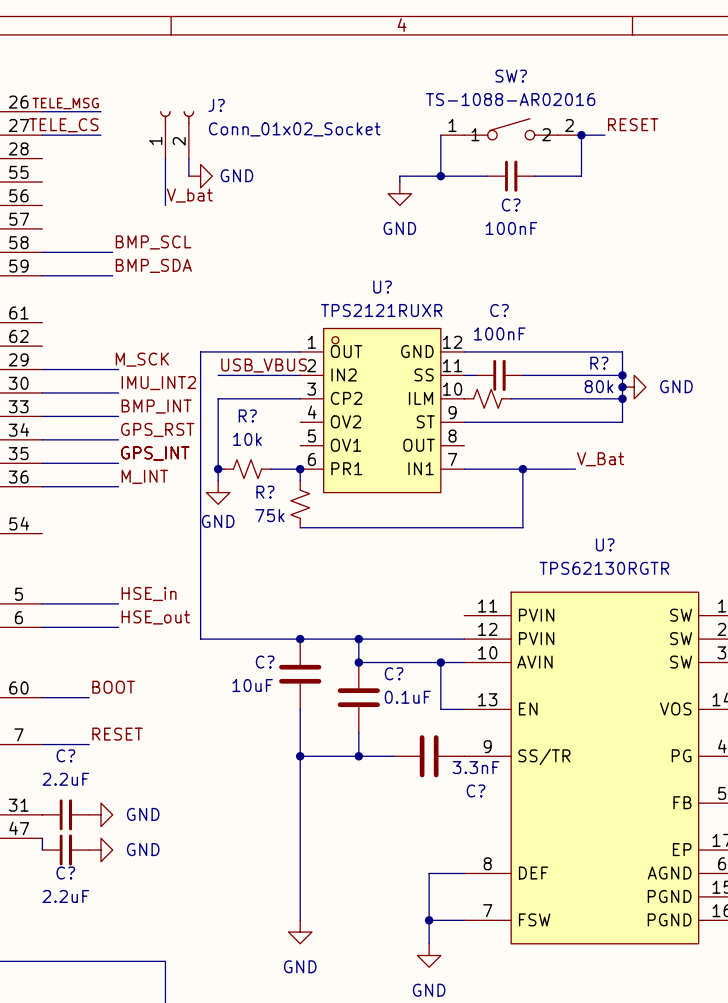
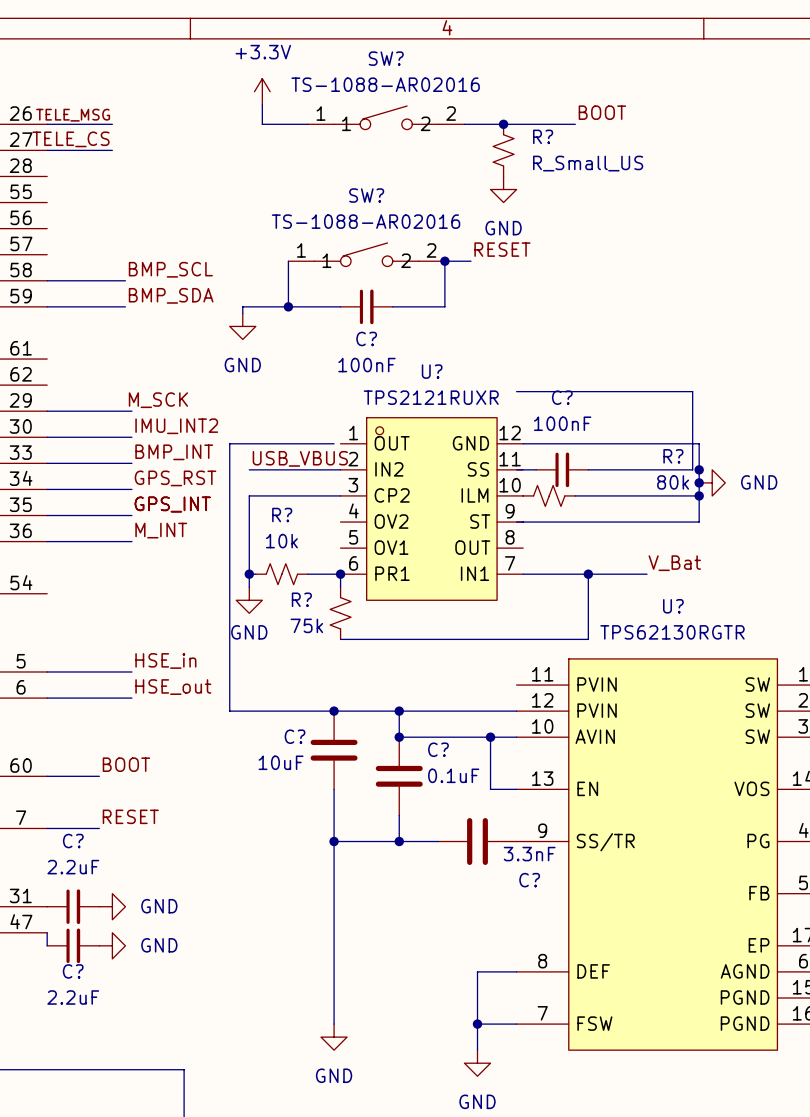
power symbol: none -> +3.3V (262, 91)
wire: none -> (262, 104) (262, 124) (307, 124)
label: none -> BOOT (602, 112)
SW?: none -> TS-1088-AR02016 (386, 117)
wire: none -> (464, 124) (575, 124)
junction: none -> (503, 124)
label position: RESET (633, 124) -> RESET (502, 249)
SW?: TS-1088-AR02016 (511, 129) -> none
J?: Conn_01x02_Socket (177, 134) -> none
wire: (440, 135) (440, 176) -> (288, 261) (288, 306)
R?: none -> R_Small_US (503, 150)
junction: (581, 135) -> none
wire: (604, 135) (581, 135) (581, 176) (534, 176) -> (470, 261) (444, 261) (444, 306) (392, 306)
wire: (165, 158) (165, 205) -> none
wire: (188, 158) (188, 176) -> none
power symbol: GND (200, 176) -> none
junction: (440, 176) -> none
wire: (487, 176) (399, 176) (399, 182) -> (340, 306) (242, 306) (242, 313)
C?: 100nF (511, 176) -> none
power symbol position: GND (399, 193) -> GND (503, 189)
label: V_bat (189, 195) -> none
SW?: none -> TS-1088-AR02016 (366, 254)
junction: none -> (444, 261)
junction: none -> (288, 306)
C?: none -> 100nF (366, 306)
power symbol: none -> GND (242, 326)
wire: (300, 351) (200, 351) (200, 639) (206, 639) -> (242, 443) (229, 443) (229, 711)
label position: USB_VBUS (264, 365) -> USB_VBUS (300, 458)
wire: (218, 375) (300, 375) -> (249, 469) (340, 469)
wire: (464, 375) (476, 375) -> none
C? position: (499, 375) -> (562, 469)
wire: (522, 375) (622, 375) -> none
junction: (622, 375) -> none
junction: (622, 387) -> none
power symbol position: GND (634, 387) -> GND (712, 482)
wire: (218, 398) (218, 480) -> none
wire: none -> (523, 443) (568, 443)
R? position: (487, 398) -> (549, 495)
wire: none -> (692, 443) (699, 443) (699, 522) (640, 522)
junction: (622, 398) -> none
U? position: (382, 410) -> (431, 508)
junction: none -> (699, 469)
junction: none -> (699, 482)
wire: none -> (340, 495) (249, 495) (249, 587)
wire: none -> (575, 495) (699, 495)
junction: none -> (699, 495)
label position: V_Bat (600, 459) -> V_Bat (674, 563)
junction: (218, 469) -> none
R? position: (247, 469) -> (281, 574)
wire: (270, 469) (300, 469) (300, 480) -> (307, 574) (340, 574) (340, 587)
junction: (300, 469) -> none
wire: (522, 469) (522, 527) (300, 527) -> (588, 574) (588, 639) (340, 639)
junction position: (522, 469) -> (588, 574)
power symbol position: GND (218, 492) -> GND (249, 600)
R? position: (300, 504) -> (340, 613)
junction: none -> (249, 574)
junction: none -> (340, 574)
wire: none -> (523, 574) (647, 574)

